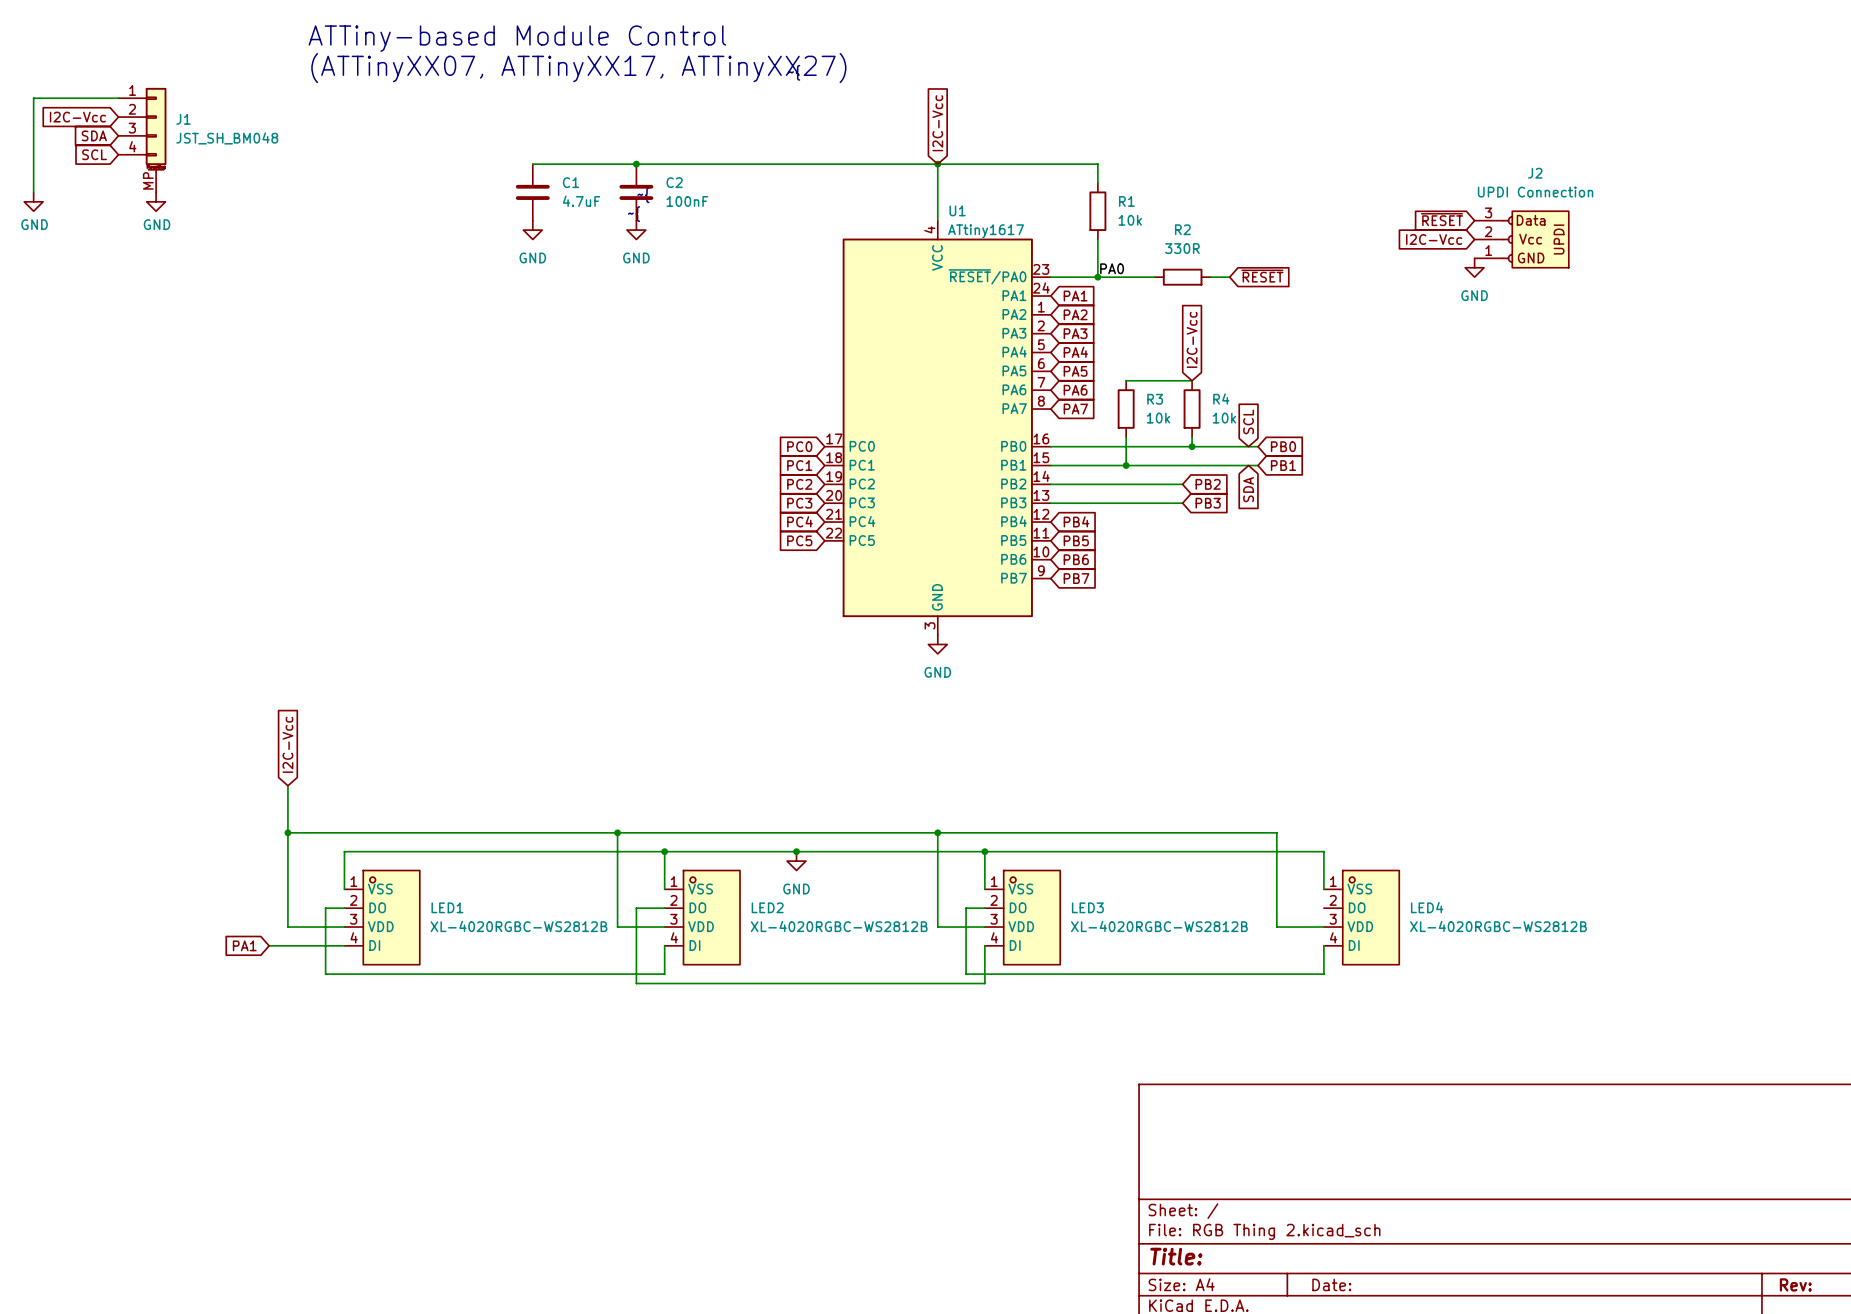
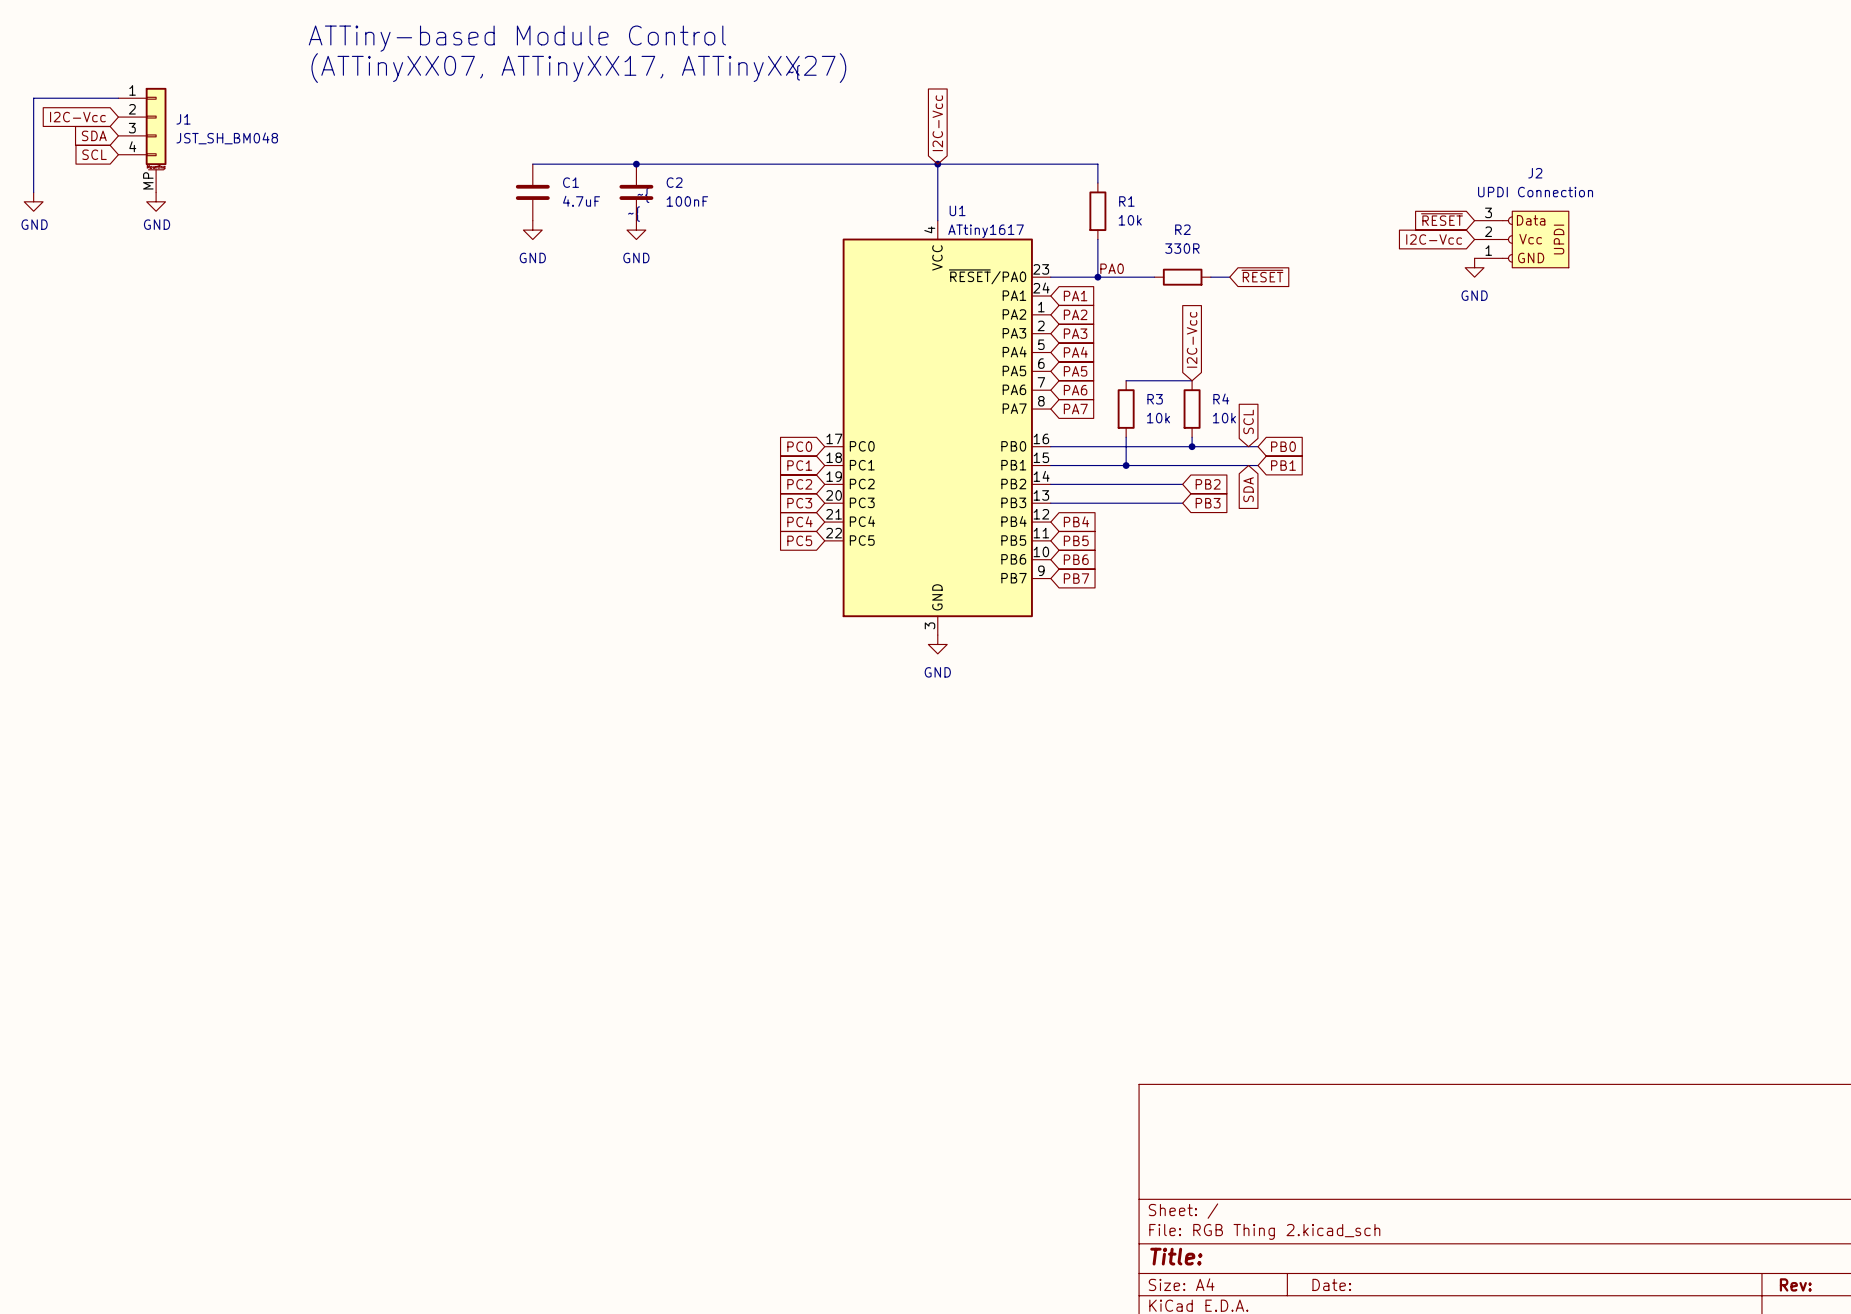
global label: I2C-Vcc (287, 744) -> none
wire: (287, 785) (287, 927) (344, 927) -> none
wire: (287, 832) (1276, 832) (1276, 927) (1323, 927) -> none
junction: (287, 832) -> none
wire: (617, 832) (617, 927) (664, 927) -> none
junction: (617, 832) -> none
wire: (937, 832) (937, 927) (984, 927) -> none
junction: (937, 832) -> none
wire: (664, 851) (664, 889) -> none
junction: (664, 851) -> none
junction: (796, 851) -> none
wire: (984, 851) (984, 889) -> none
junction: (984, 851) -> none
power symbol: GND (796, 861) -> none
wire: (344, 889) (344, 851) (1323, 851) (1323, 889) -> none
wire: (344, 908) (325, 908) (325, 974) (664, 974) (664, 945) -> none
wire: (664, 908) (636, 908) (636, 983) (984, 983) (984, 945) -> none
wire: (984, 908) (966, 908) (966, 974) (1323, 974) (1323, 945) -> none
LED1: XL-4020RGBC-WS2812B (382, 917) -> none
LED2: XL-4020RGBC-WS2812B (702, 917) -> none
LED3: XL-4020RGBC-WS2812B (1022, 917) -> none
LED4: XL-4020RGBC-WS2812B (1361, 917) -> none
global label: PA1 (244, 945) -> none
wire: (269, 945) (344, 945) -> none

